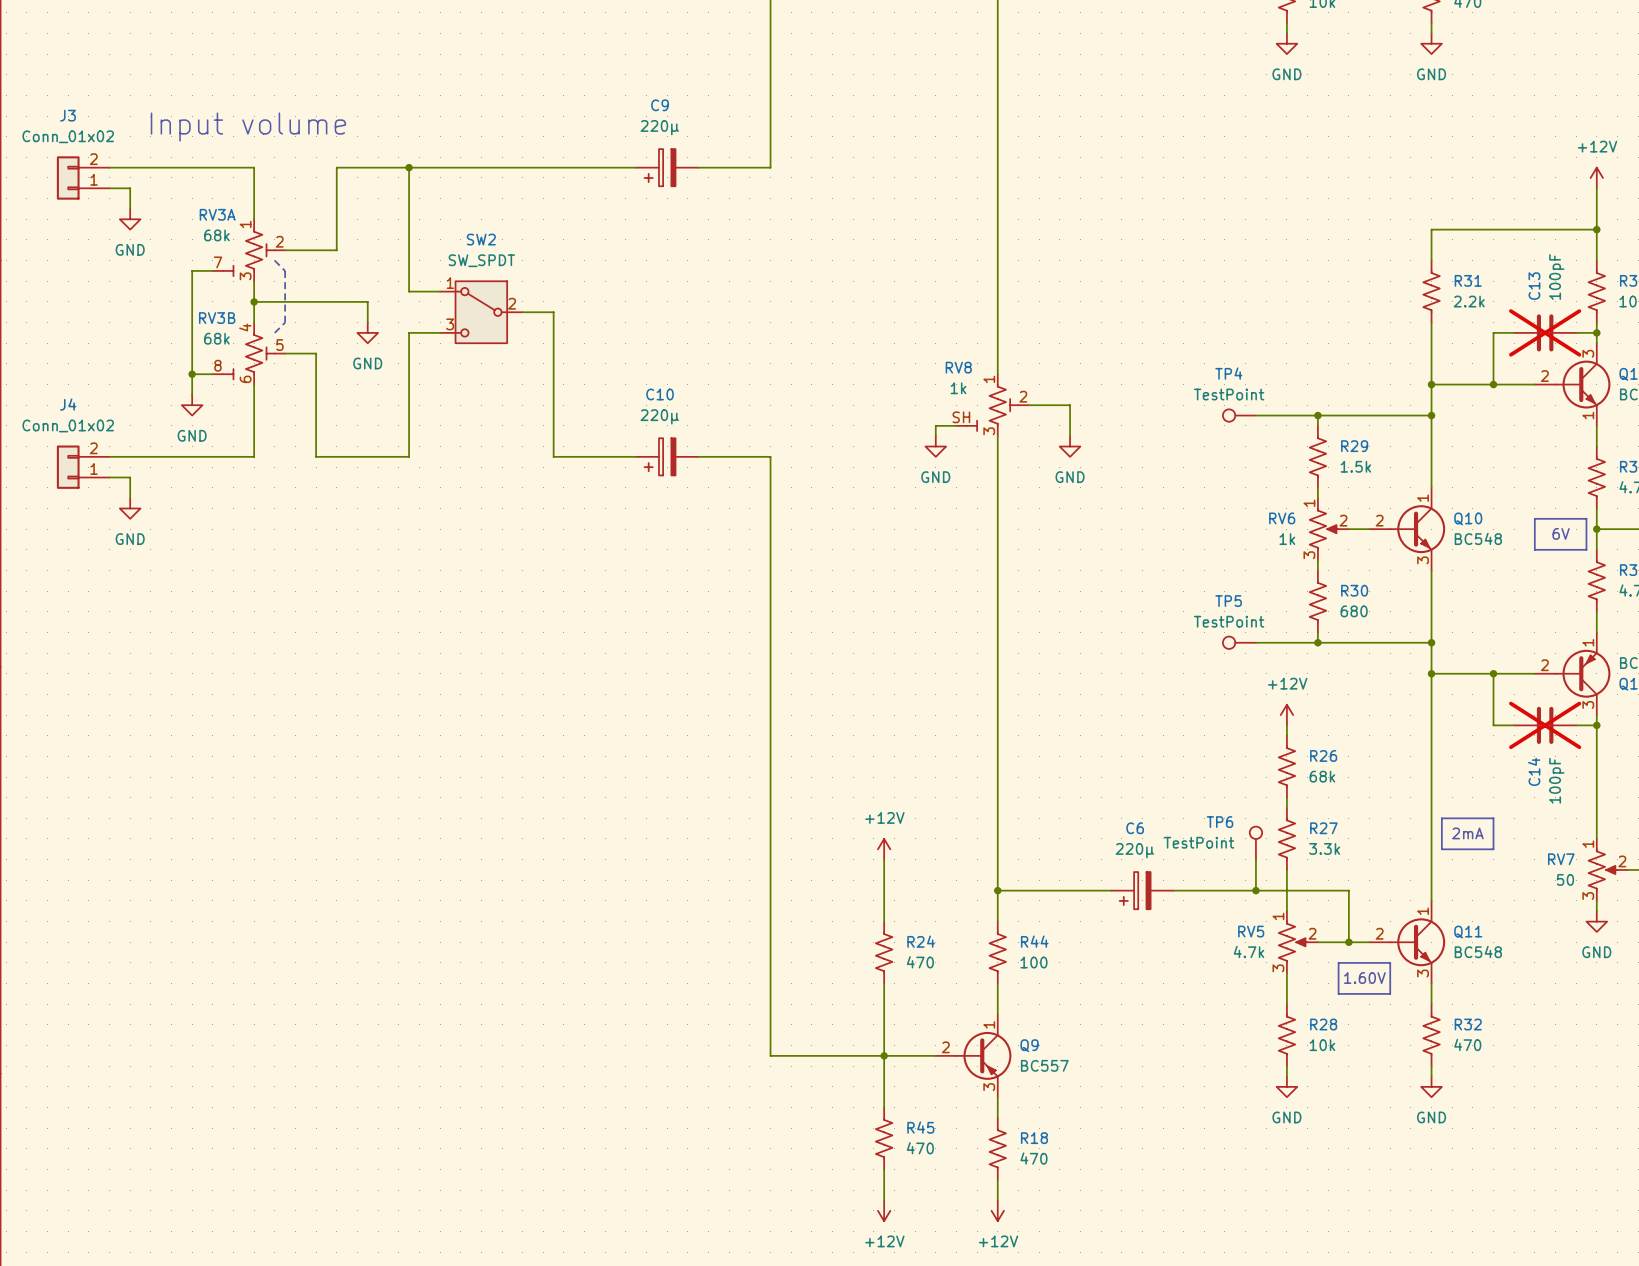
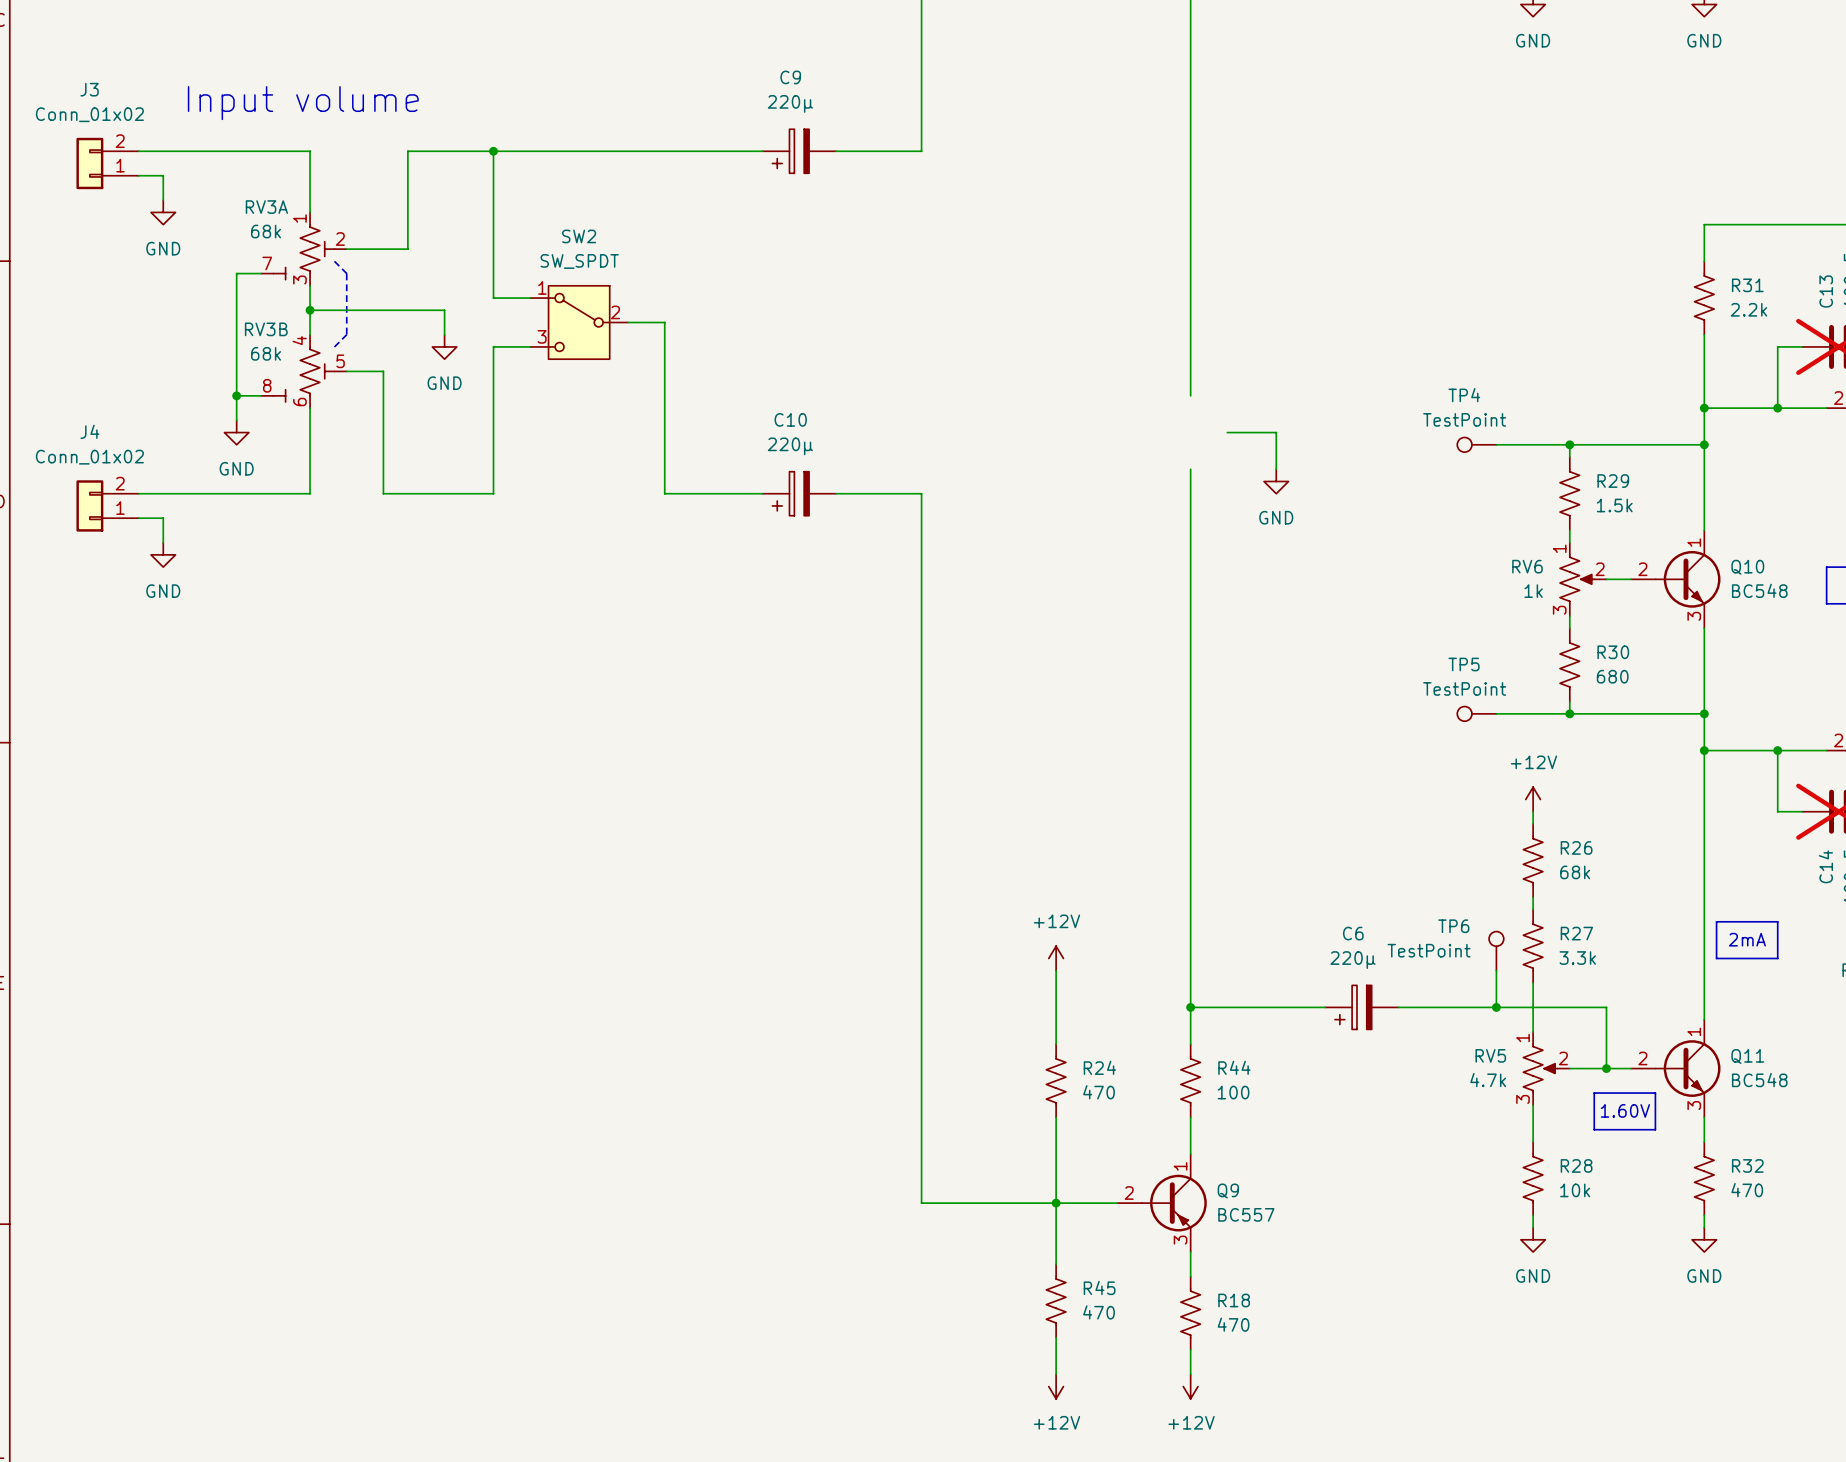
RV8: 1k (992, 405) -> none
wire: (956, 425) (935, 425) (935, 436) -> none
power symbol: GND (935, 446) -> none

